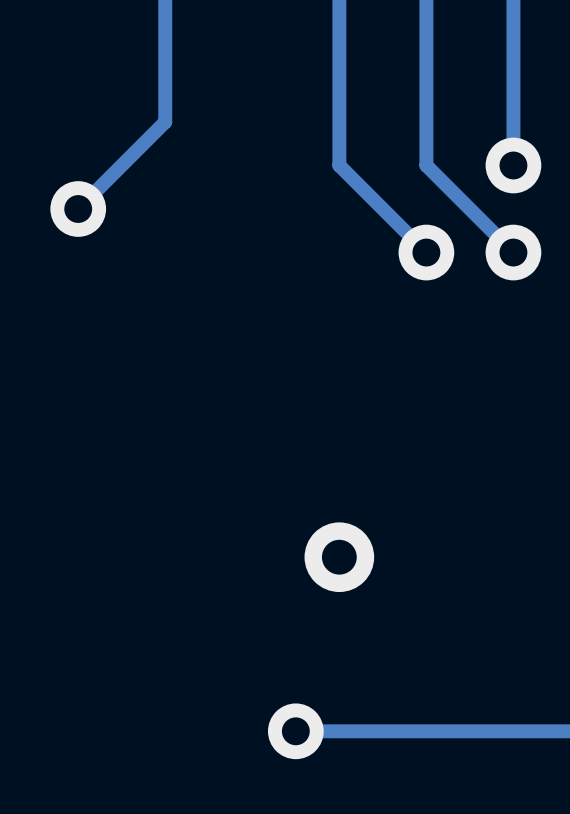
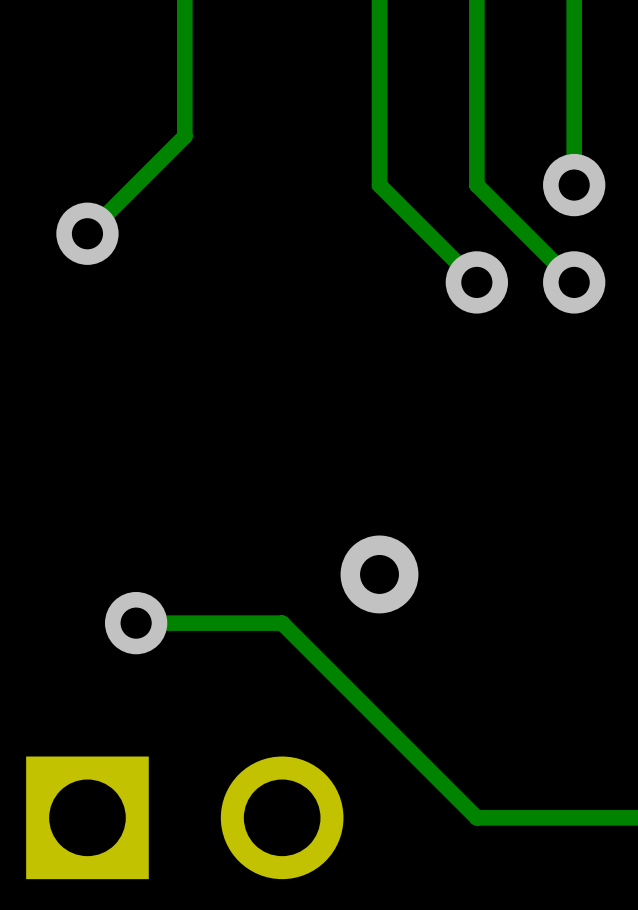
via position: (339, 557) -> (379, 574)
part: none -> (184, 817)
via position: (295, 731) -> (136, 623)
track: (426, 731) (295, 731) -> (476, 817) (282, 623) (136, 623)

